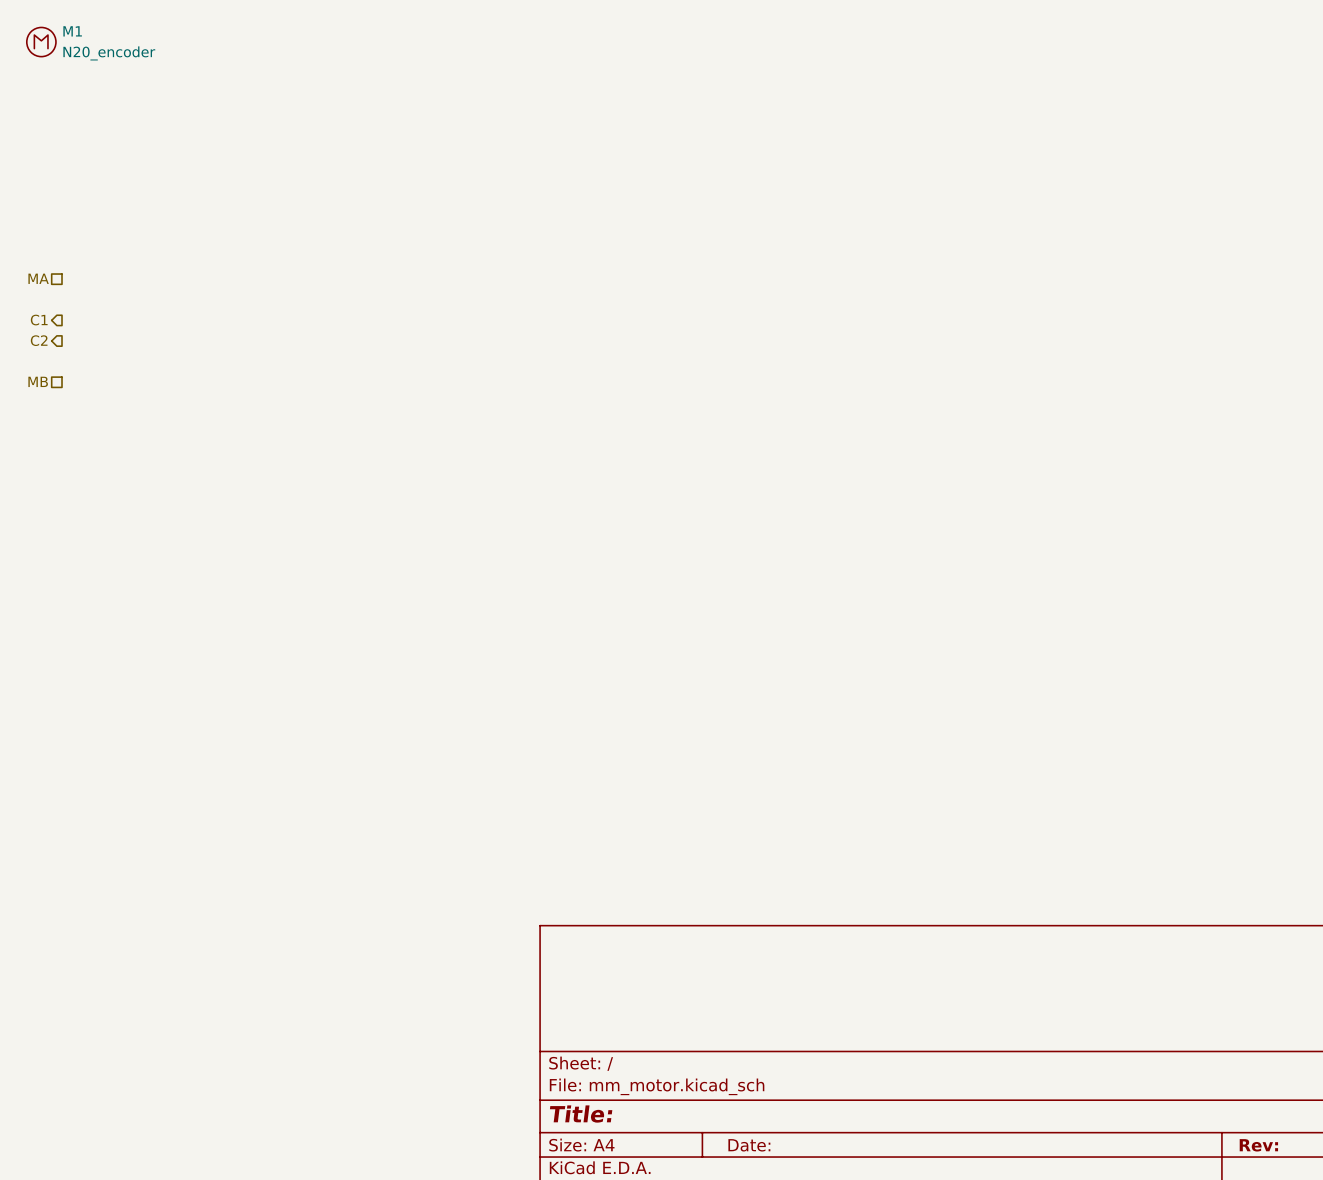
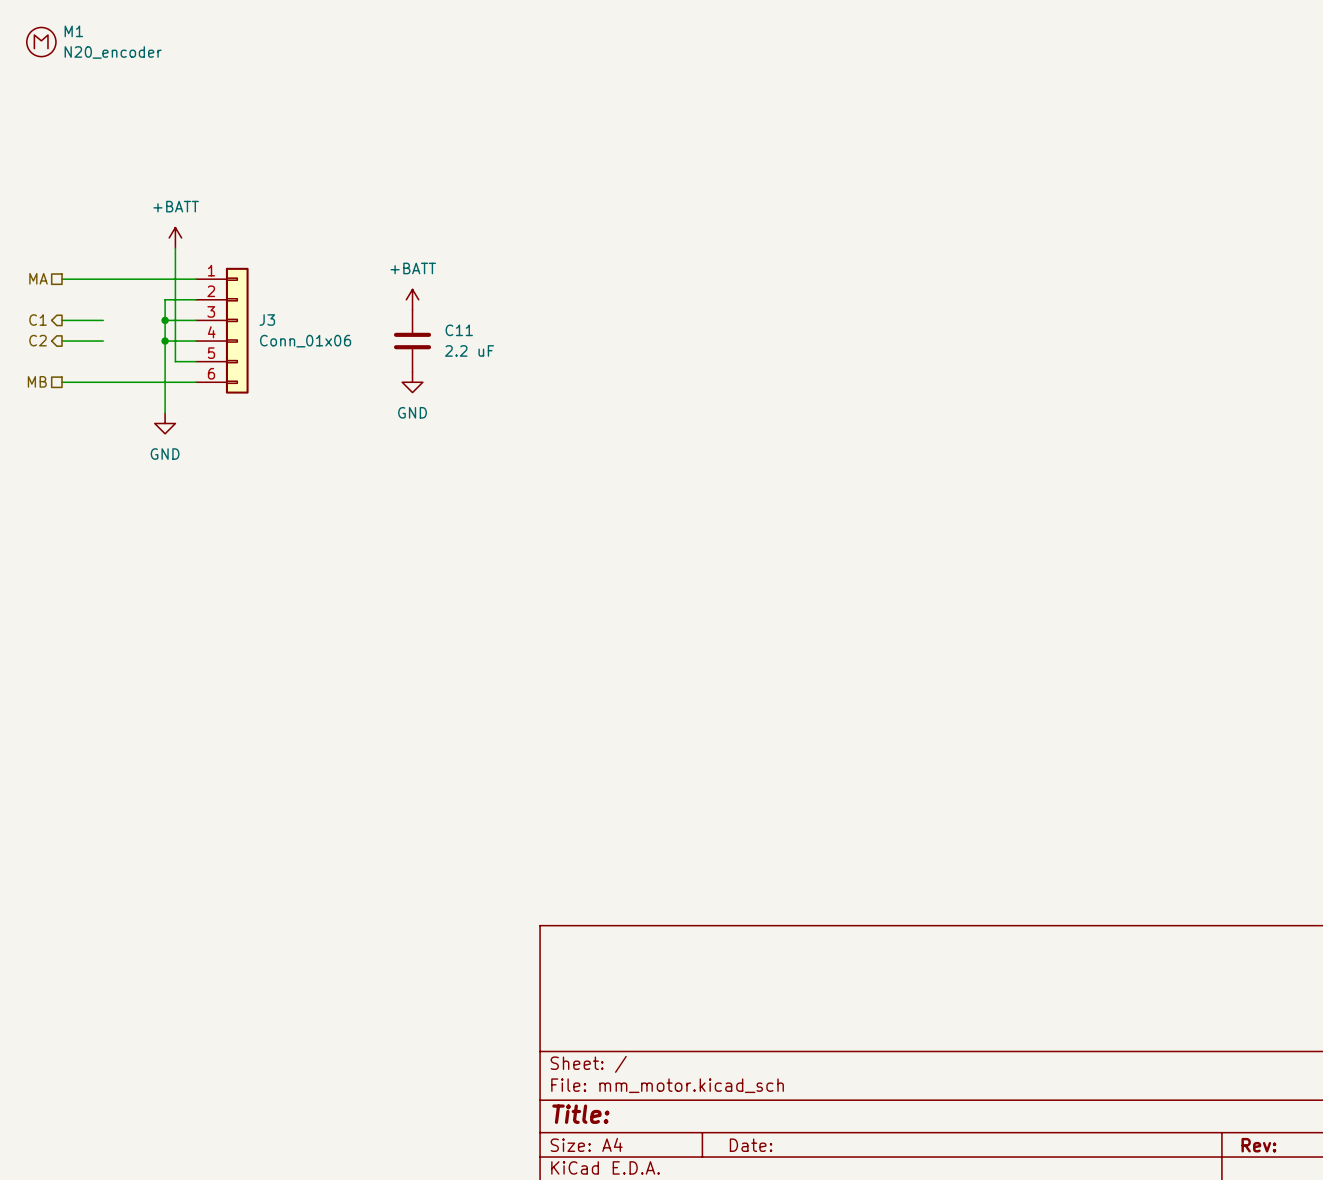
power symbol: none -> +BATT (175, 237)
wire: none -> (175, 248) (175, 361) (196, 361)
wire: none -> (62, 279) (196, 279)
wire: none -> (196, 299) (165, 299) (165, 413)
power symbol: none -> +BATT (412, 299)
wire: none -> (62, 320) (103, 320)
wire: none -> (165, 320) (196, 320)
junction: none -> (165, 320)
J3: none -> Conn_01x06 (222, 330)
wire: none -> (62, 341) (103, 341)
wire: none -> (165, 341) (196, 341)
junction: none -> (165, 341)
C11: none -> 2.2 uF (412, 341)
wire: none -> (62, 382) (196, 382)
power symbol: none -> GND (412, 382)
power symbol: none -> GND (165, 423)

